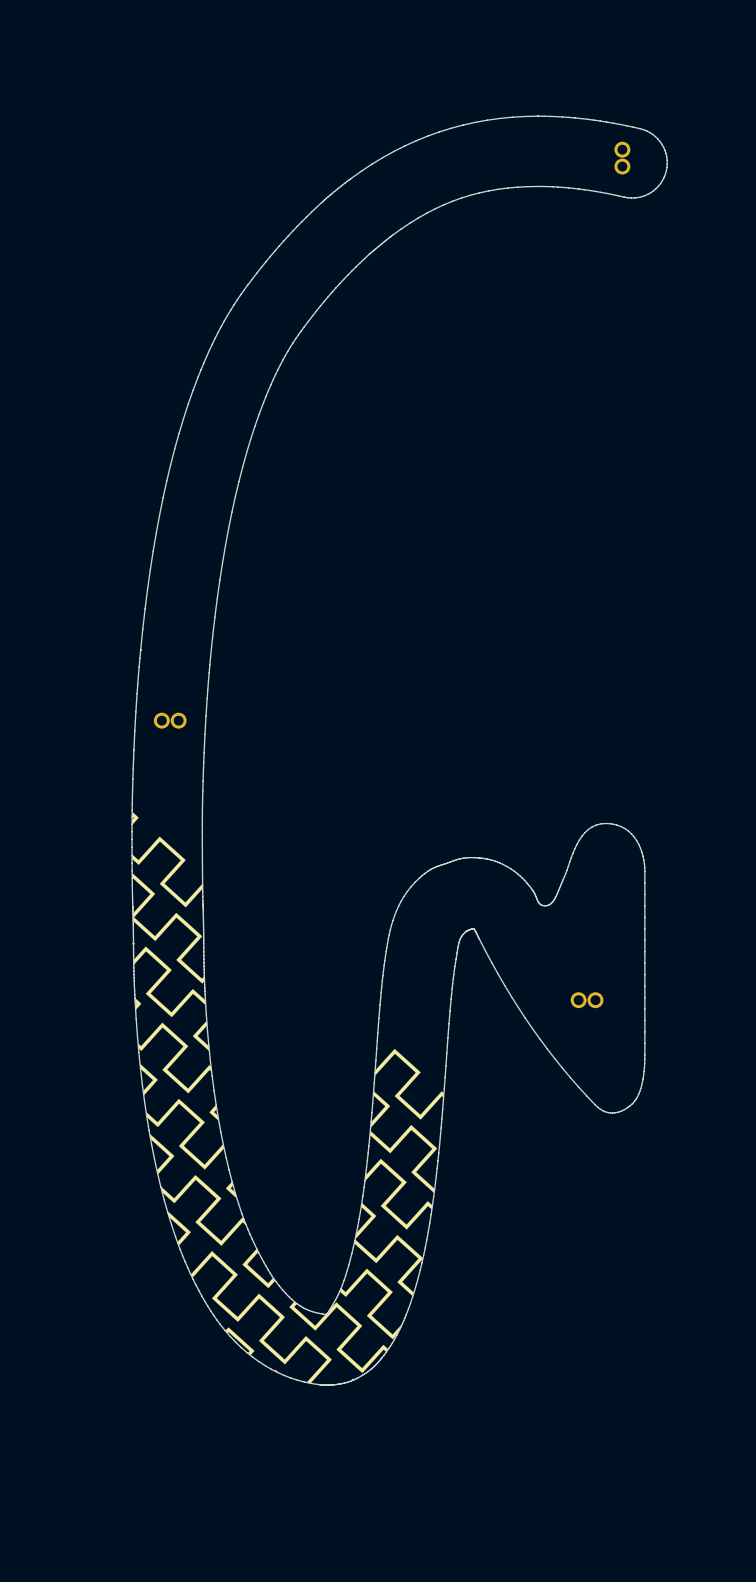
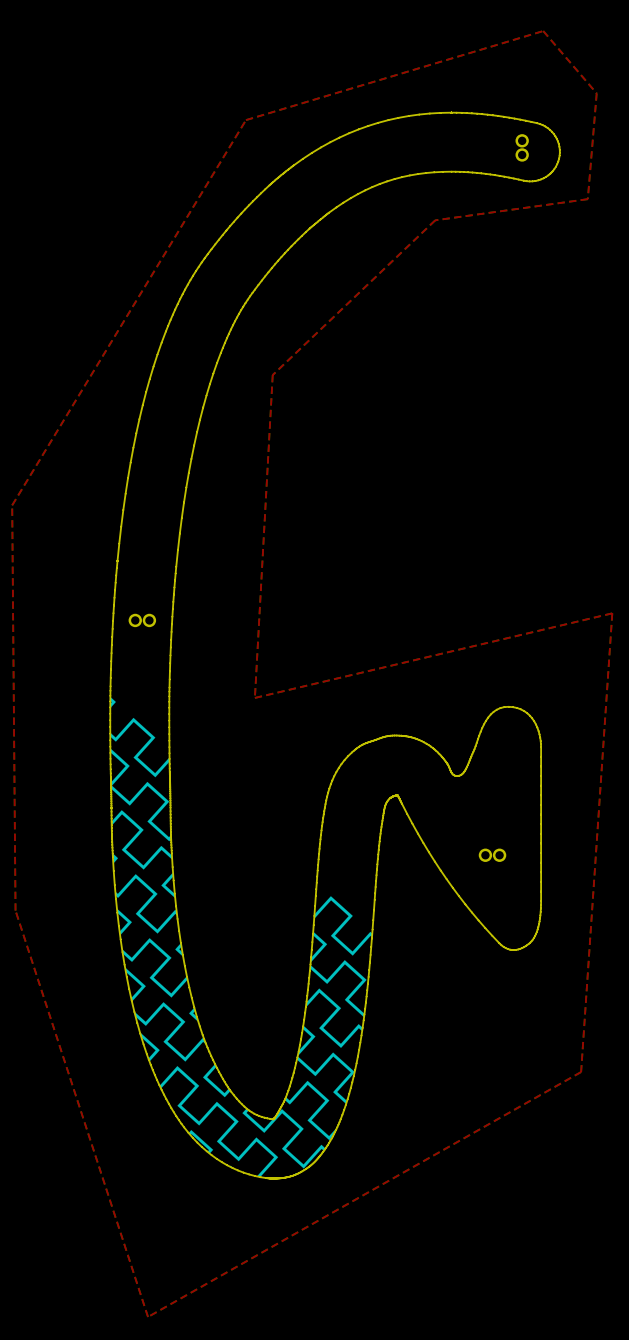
top zone outline: none -> (543, 31) (246, 120) (12, 505) (15, 910) (148, 1316) (581, 1072) (612, 613) (254, 697) (272, 375) (435, 220) (587, 199) (596, 93) (543, 31)

